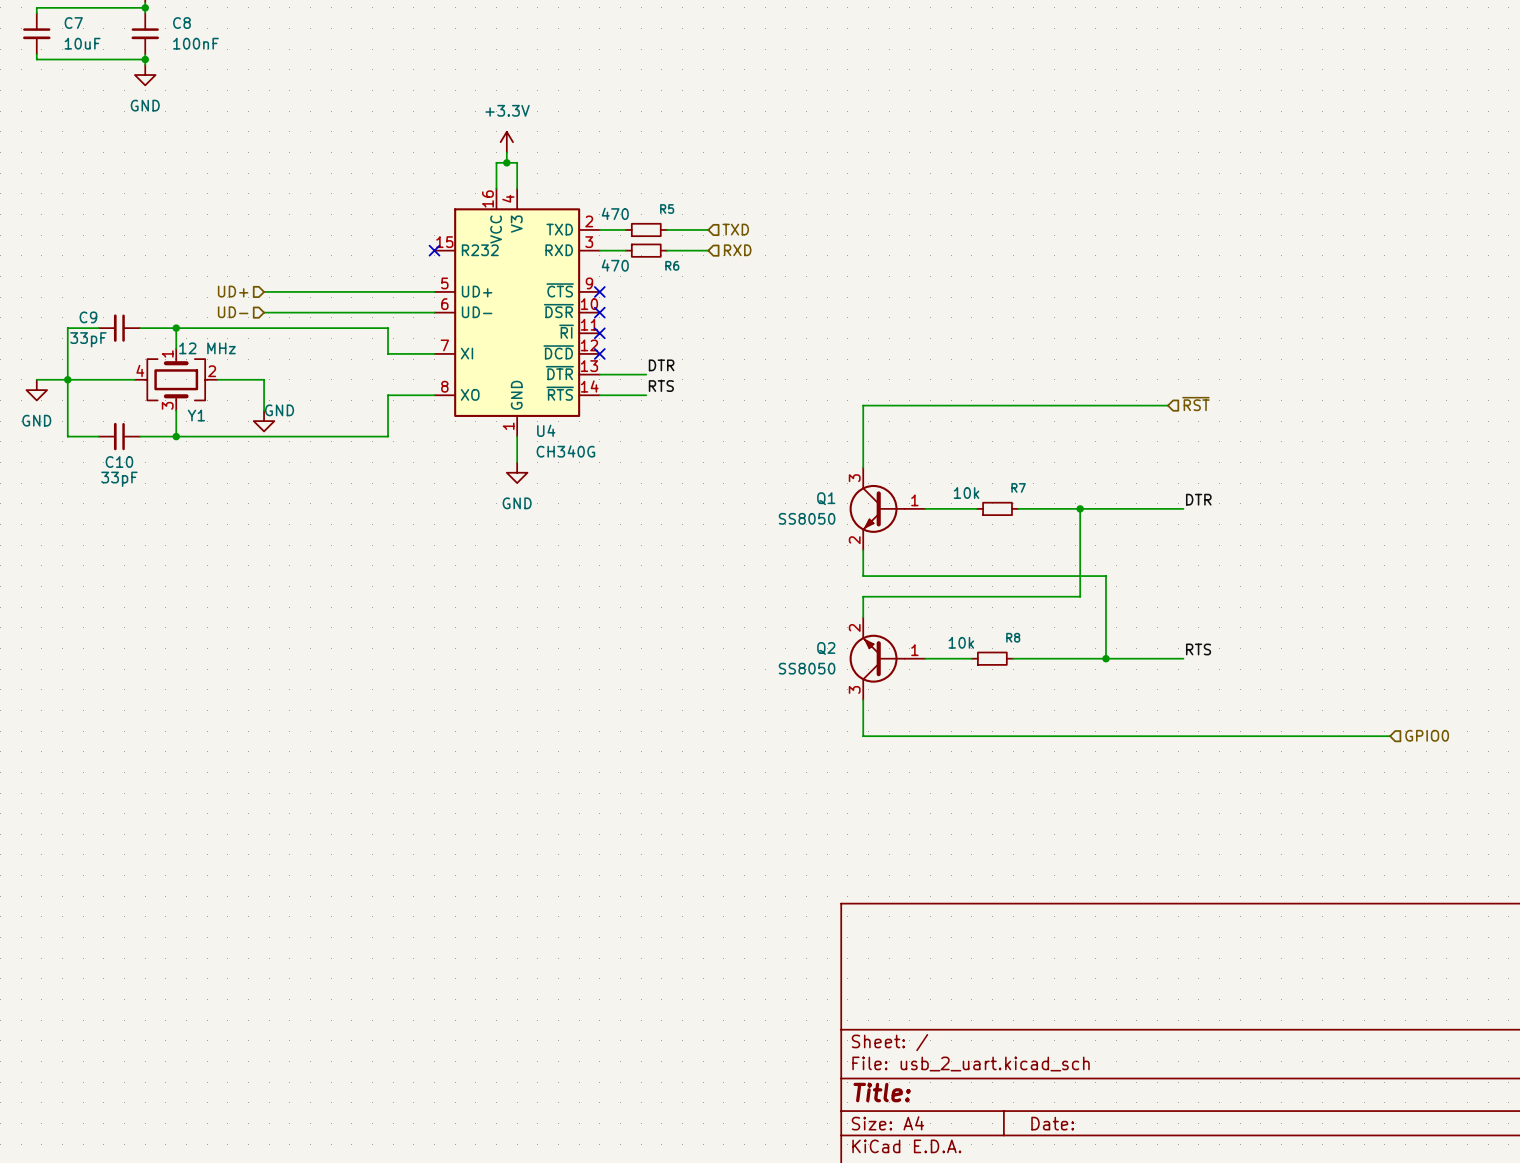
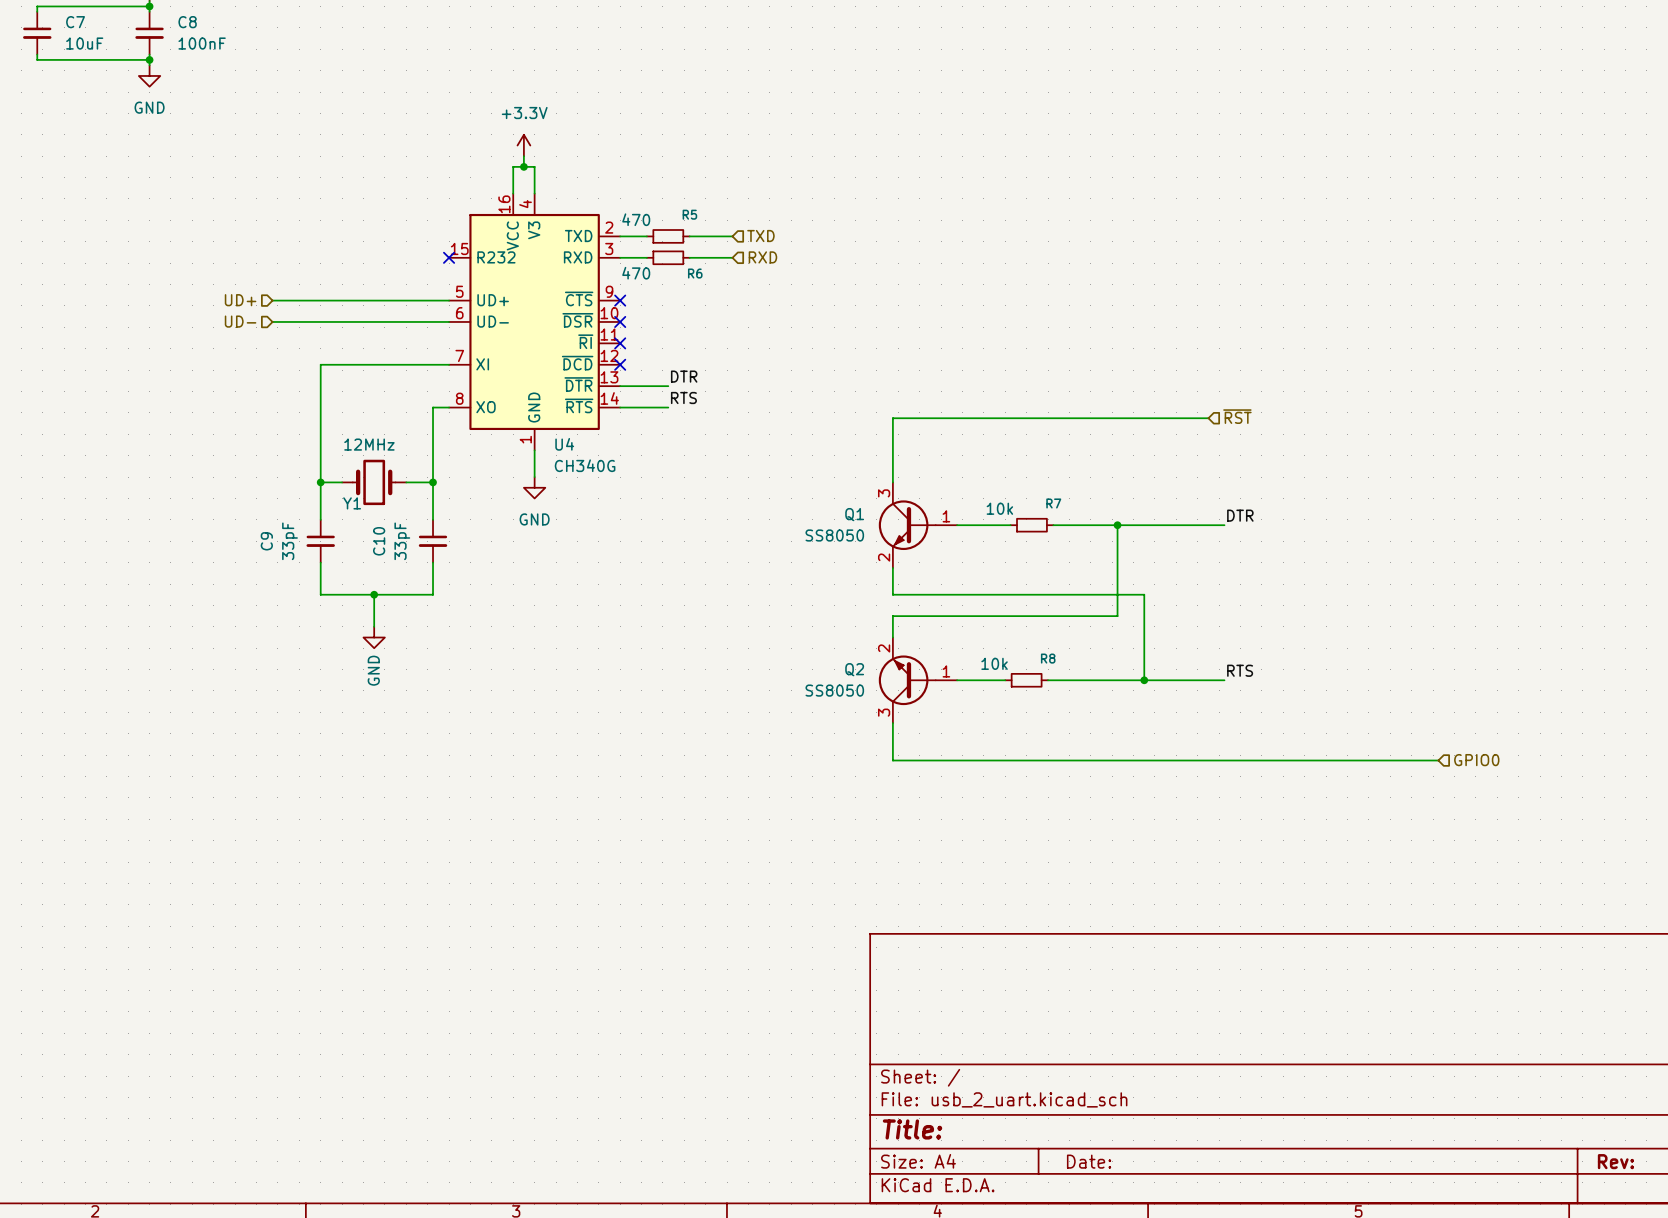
C9 name position: C9 (88, 317) -> C9 (266, 541)
wire: (98, 328) (67, 328) (67, 436) (98, 436) -> none
C9 rotation: 0° (119, 328) -> 90° counterclockwise (320, 541)
C9 position: (119, 328) -> (320, 541)
wire: (140, 328) (388, 328) (388, 353) -> (320, 519) (320, 364) (400, 364)
wire: (176, 328) (176, 348) -> none
junction: (176, 328) -> none
Y1 symbol: [134, 348, 218, 411] -> [342, 459, 407, 506]
Y1 value: 12 MHz (207, 348) -> 12MHz (369, 444)
wire: (36, 379) (134, 379) -> none
junction: (67, 379) -> none
wire: (217, 379) (264, 379) (264, 410) -> none
power symbol: GND (36, 390) -> none
wire: (419, 395) (388, 395) (388, 436) (140, 436) -> (433, 407) (433, 519)
wire: (176, 410) (176, 436) -> none
Y1 name position: Y1 (196, 415) -> Y1 (352, 503)
power symbol: GND (264, 421) -> none
C10 rotation: 0° (119, 436) -> 90° counterclockwise (433, 541)
C10 position: (119, 436) -> (433, 541)
junction: (176, 436) -> none
C10 name position: C10 (119, 462) -> C10 (379, 541)
wire: none -> (320, 482) (342, 482)
junction: none -> (320, 482)
wire: none -> (406, 482) (433, 482)
junction: none -> (433, 482)
C10 value position: 33pF (119, 479) -> 33pF (402, 541)
wire: none -> (320, 562) (320, 594) (433, 594) (433, 562)
wire: none -> (374, 594) (374, 626)
junction: none -> (374, 594)
power symbol: none -> GND (374, 637)

